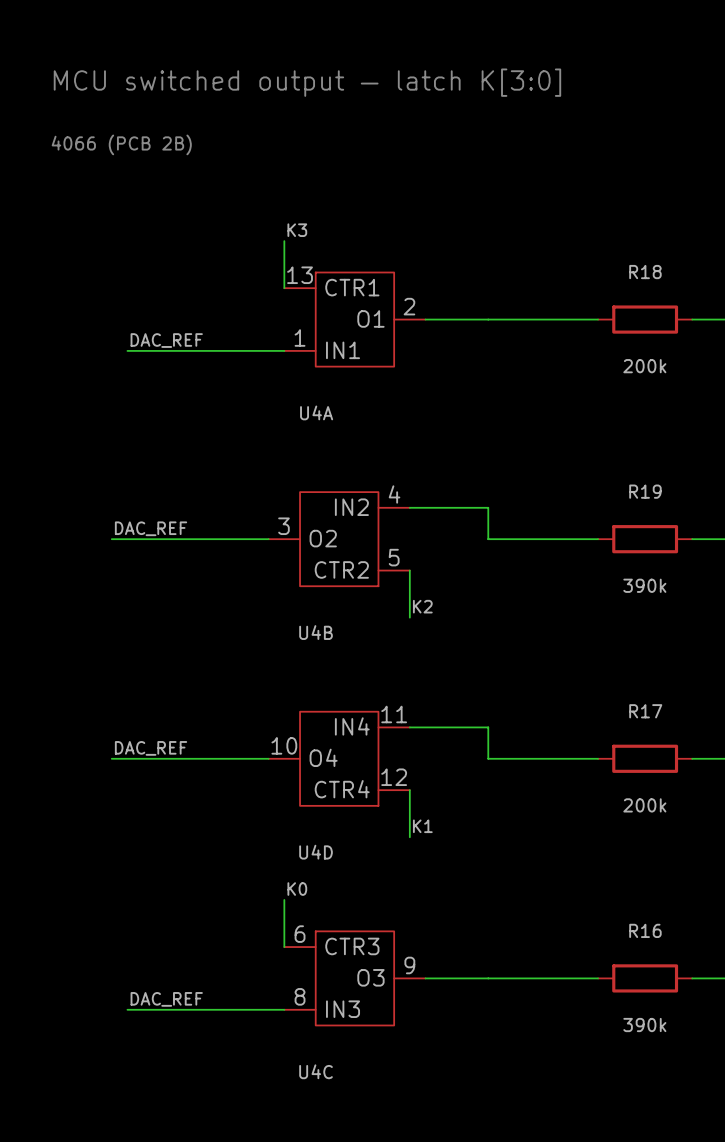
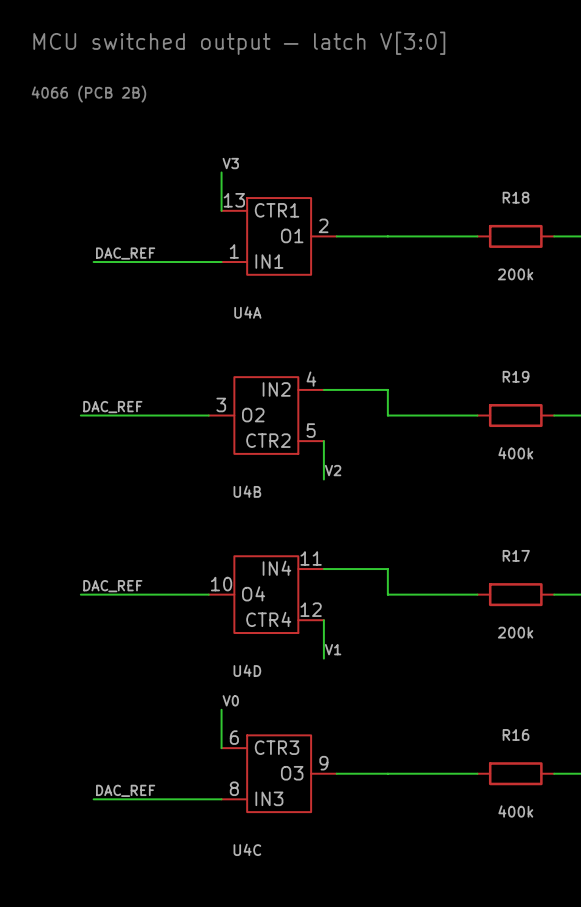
text: MCU switched output — latch K[3:0] (307, 82) -> MCU switched output — latch V[3:0] (239, 43)
label: K3 (297, 230) -> V3 (230, 163)
R19 value: 390k (644, 585) -> 400k (515, 453)
label: K2 (422, 606) -> V2 (333, 470)
label: K1 (422, 826) -> V1 (333, 649)
label: K0 (297, 889) -> V0 (230, 700)
R16 value: 390k (644, 1025) -> 400k (515, 811)

